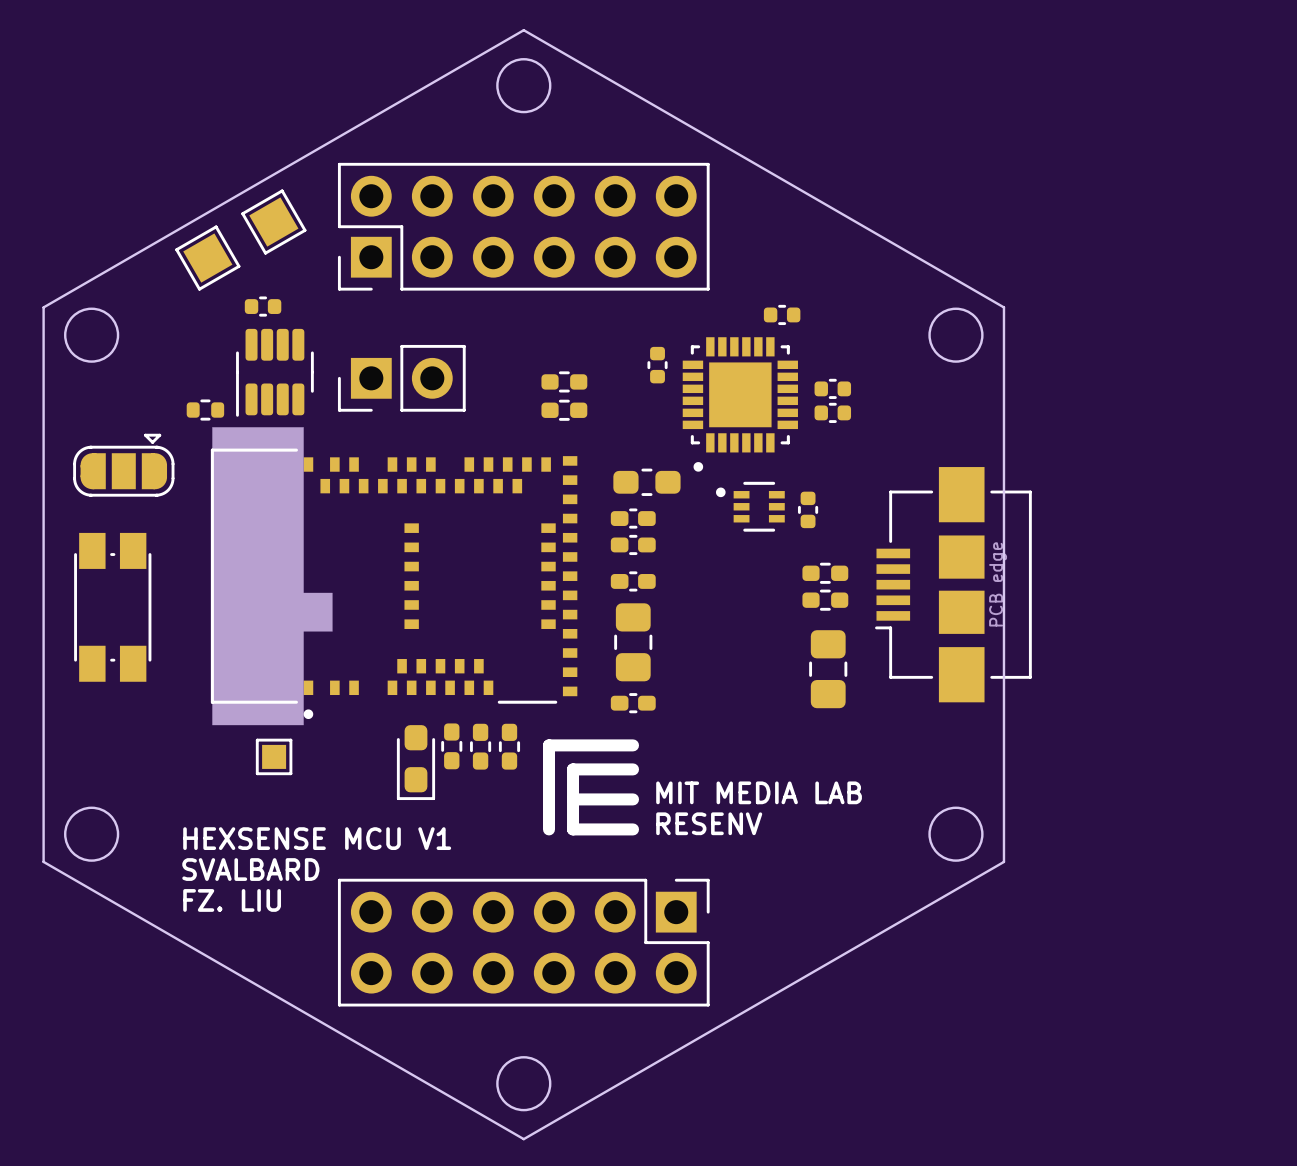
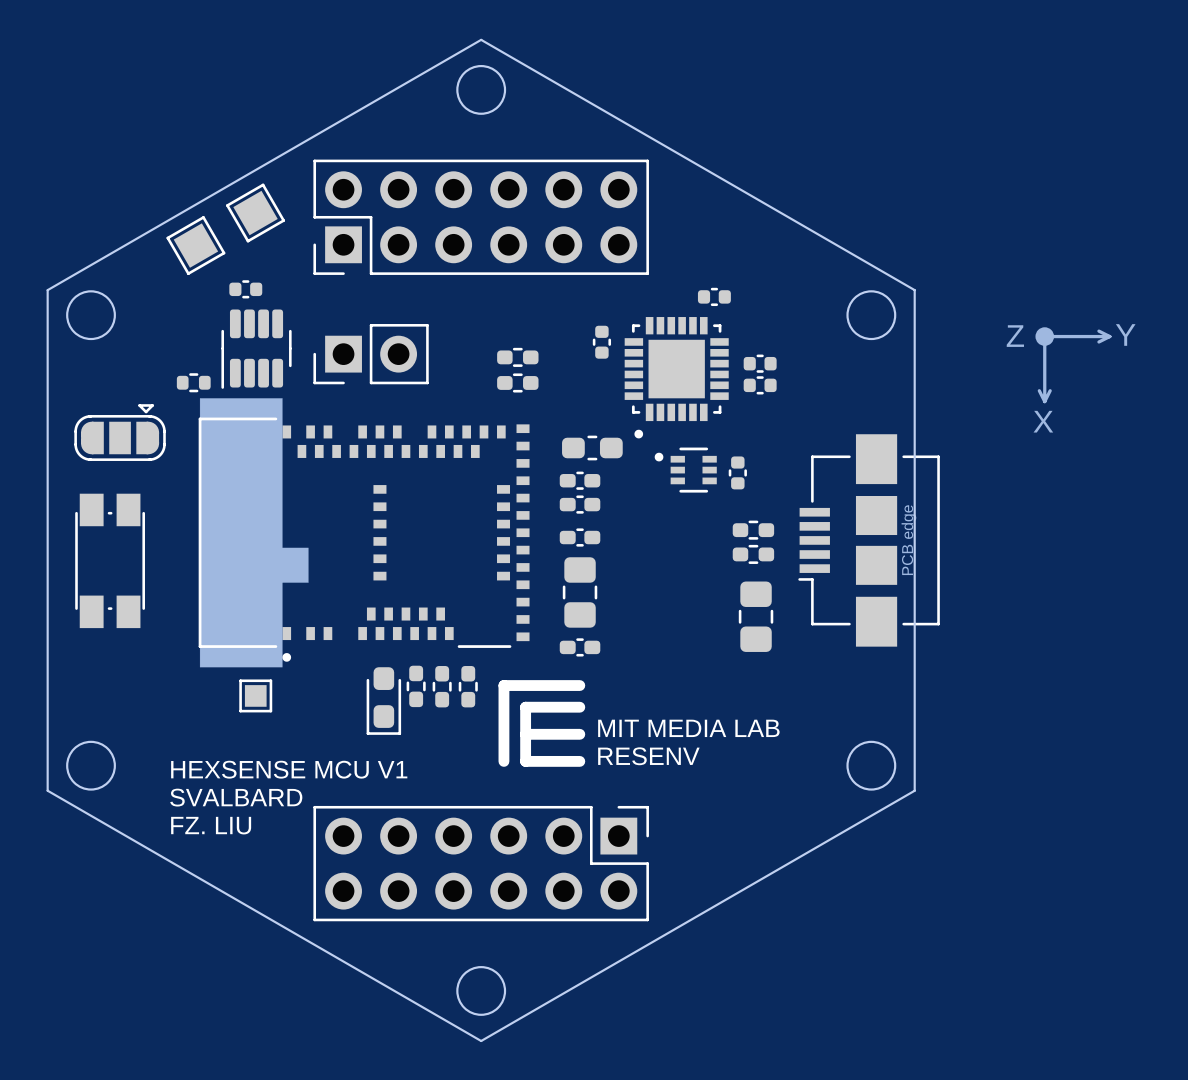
drawing: none -> [1035, 327, 1055, 346]
line: none -> (1098, 331) (1109, 336)
text: none -> Y (1125, 334)
text: none -> Z (1015, 336)
line: none -> (1109, 336) (1098, 341)
line: none -> (1109, 336) (1044, 336) (1044, 401)
line: none -> (1039, 390) (1044, 401)
line: none -> (1050, 390) (1044, 401)
text: none -> X (1043, 421)

